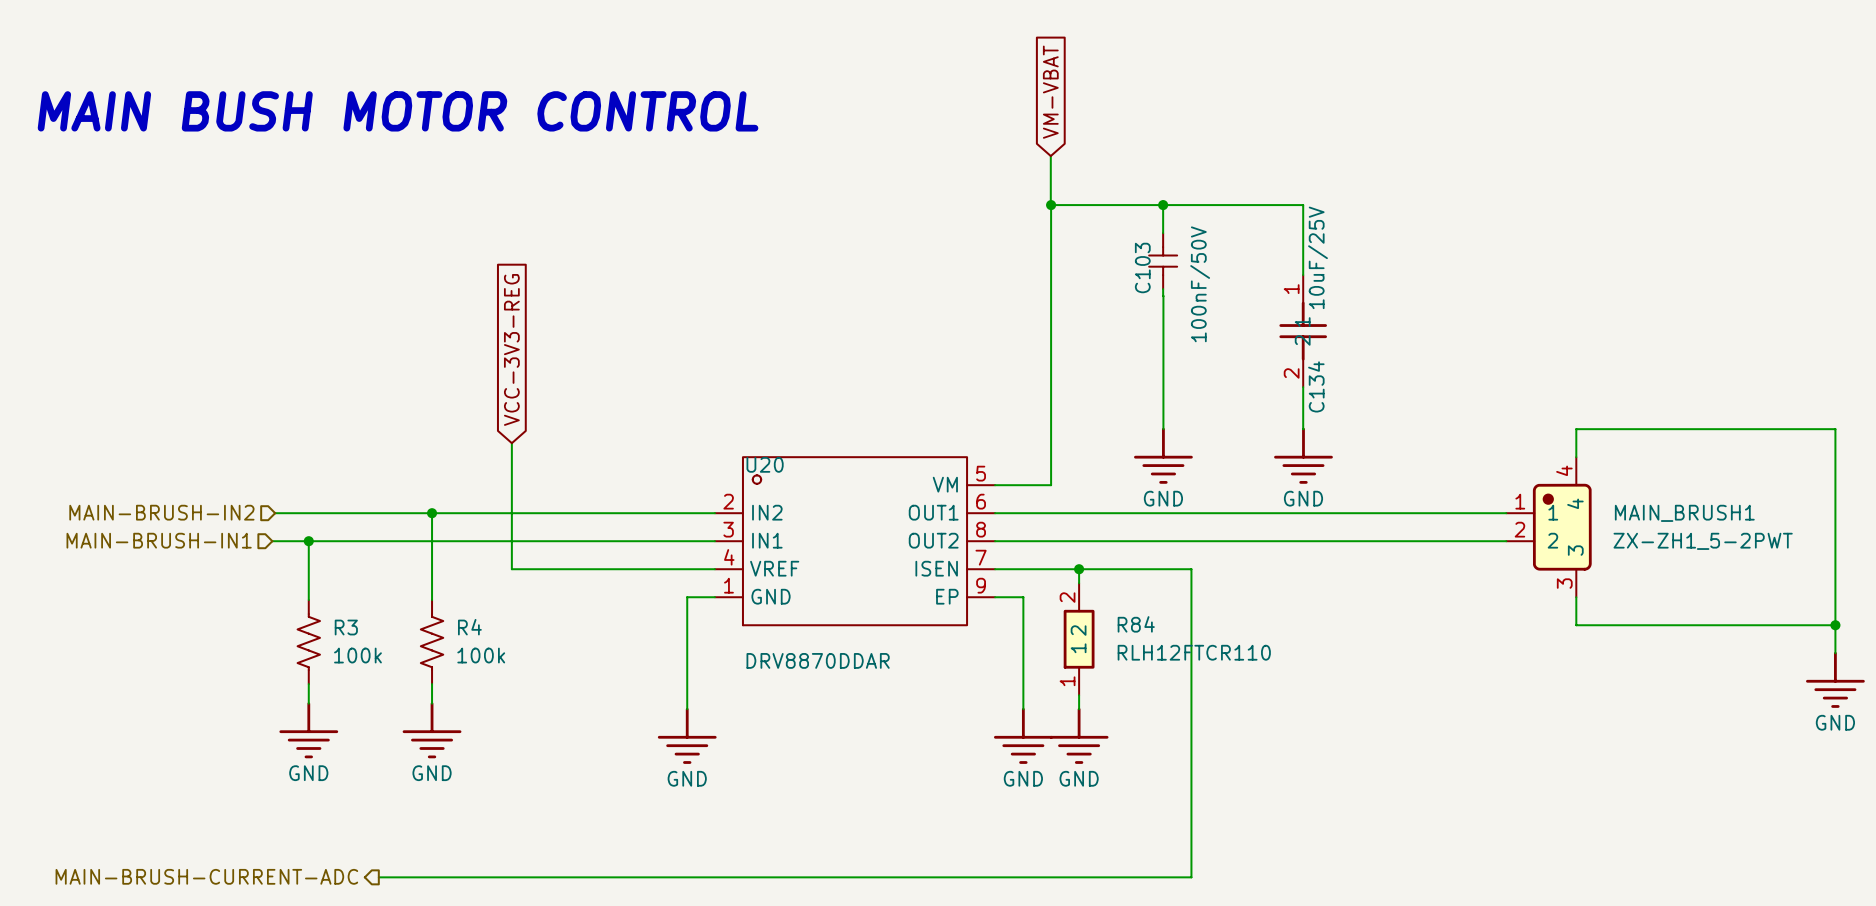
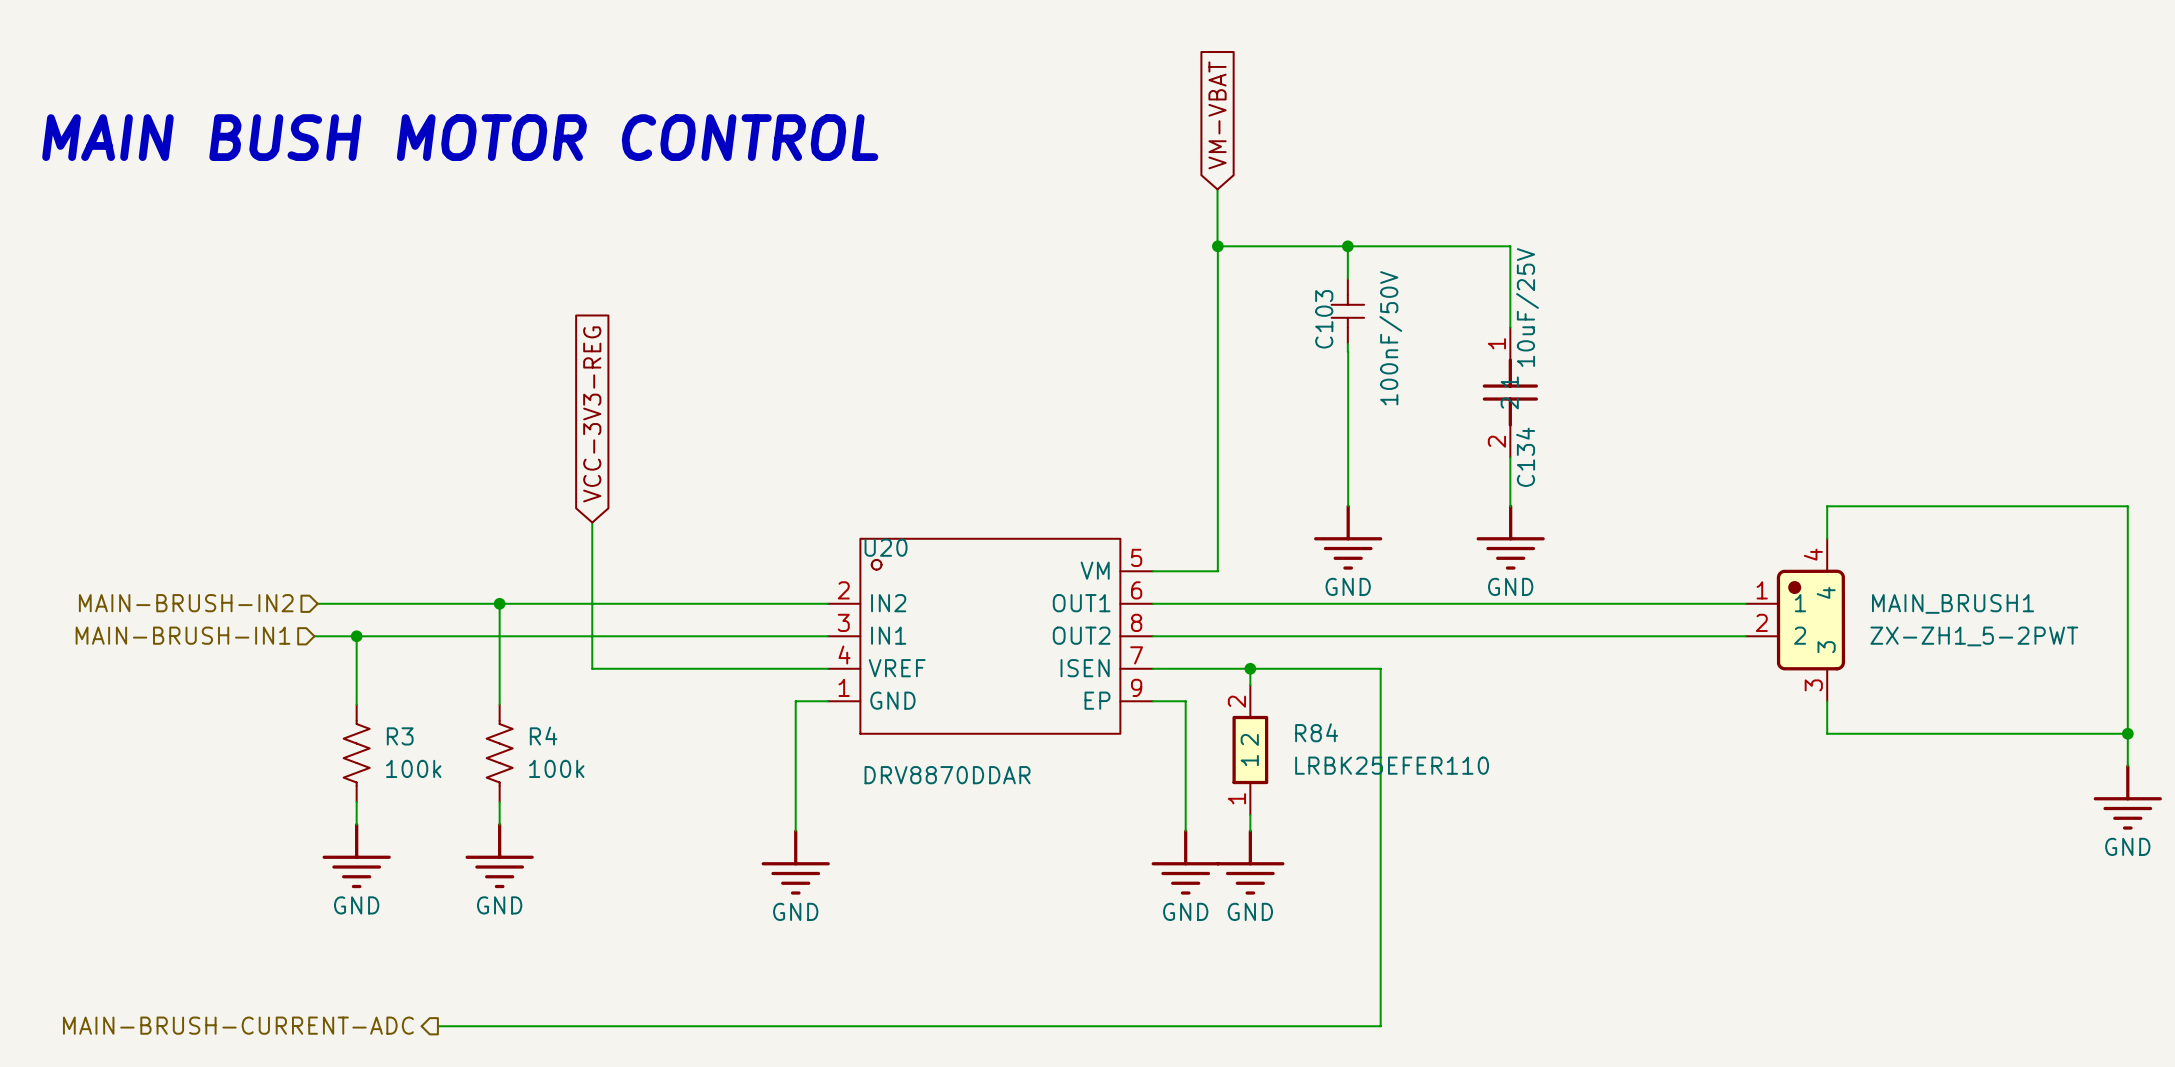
R84 value: RLH12FTCR110 (1194, 652) -> LRBK25EFER110 (1392, 765)

